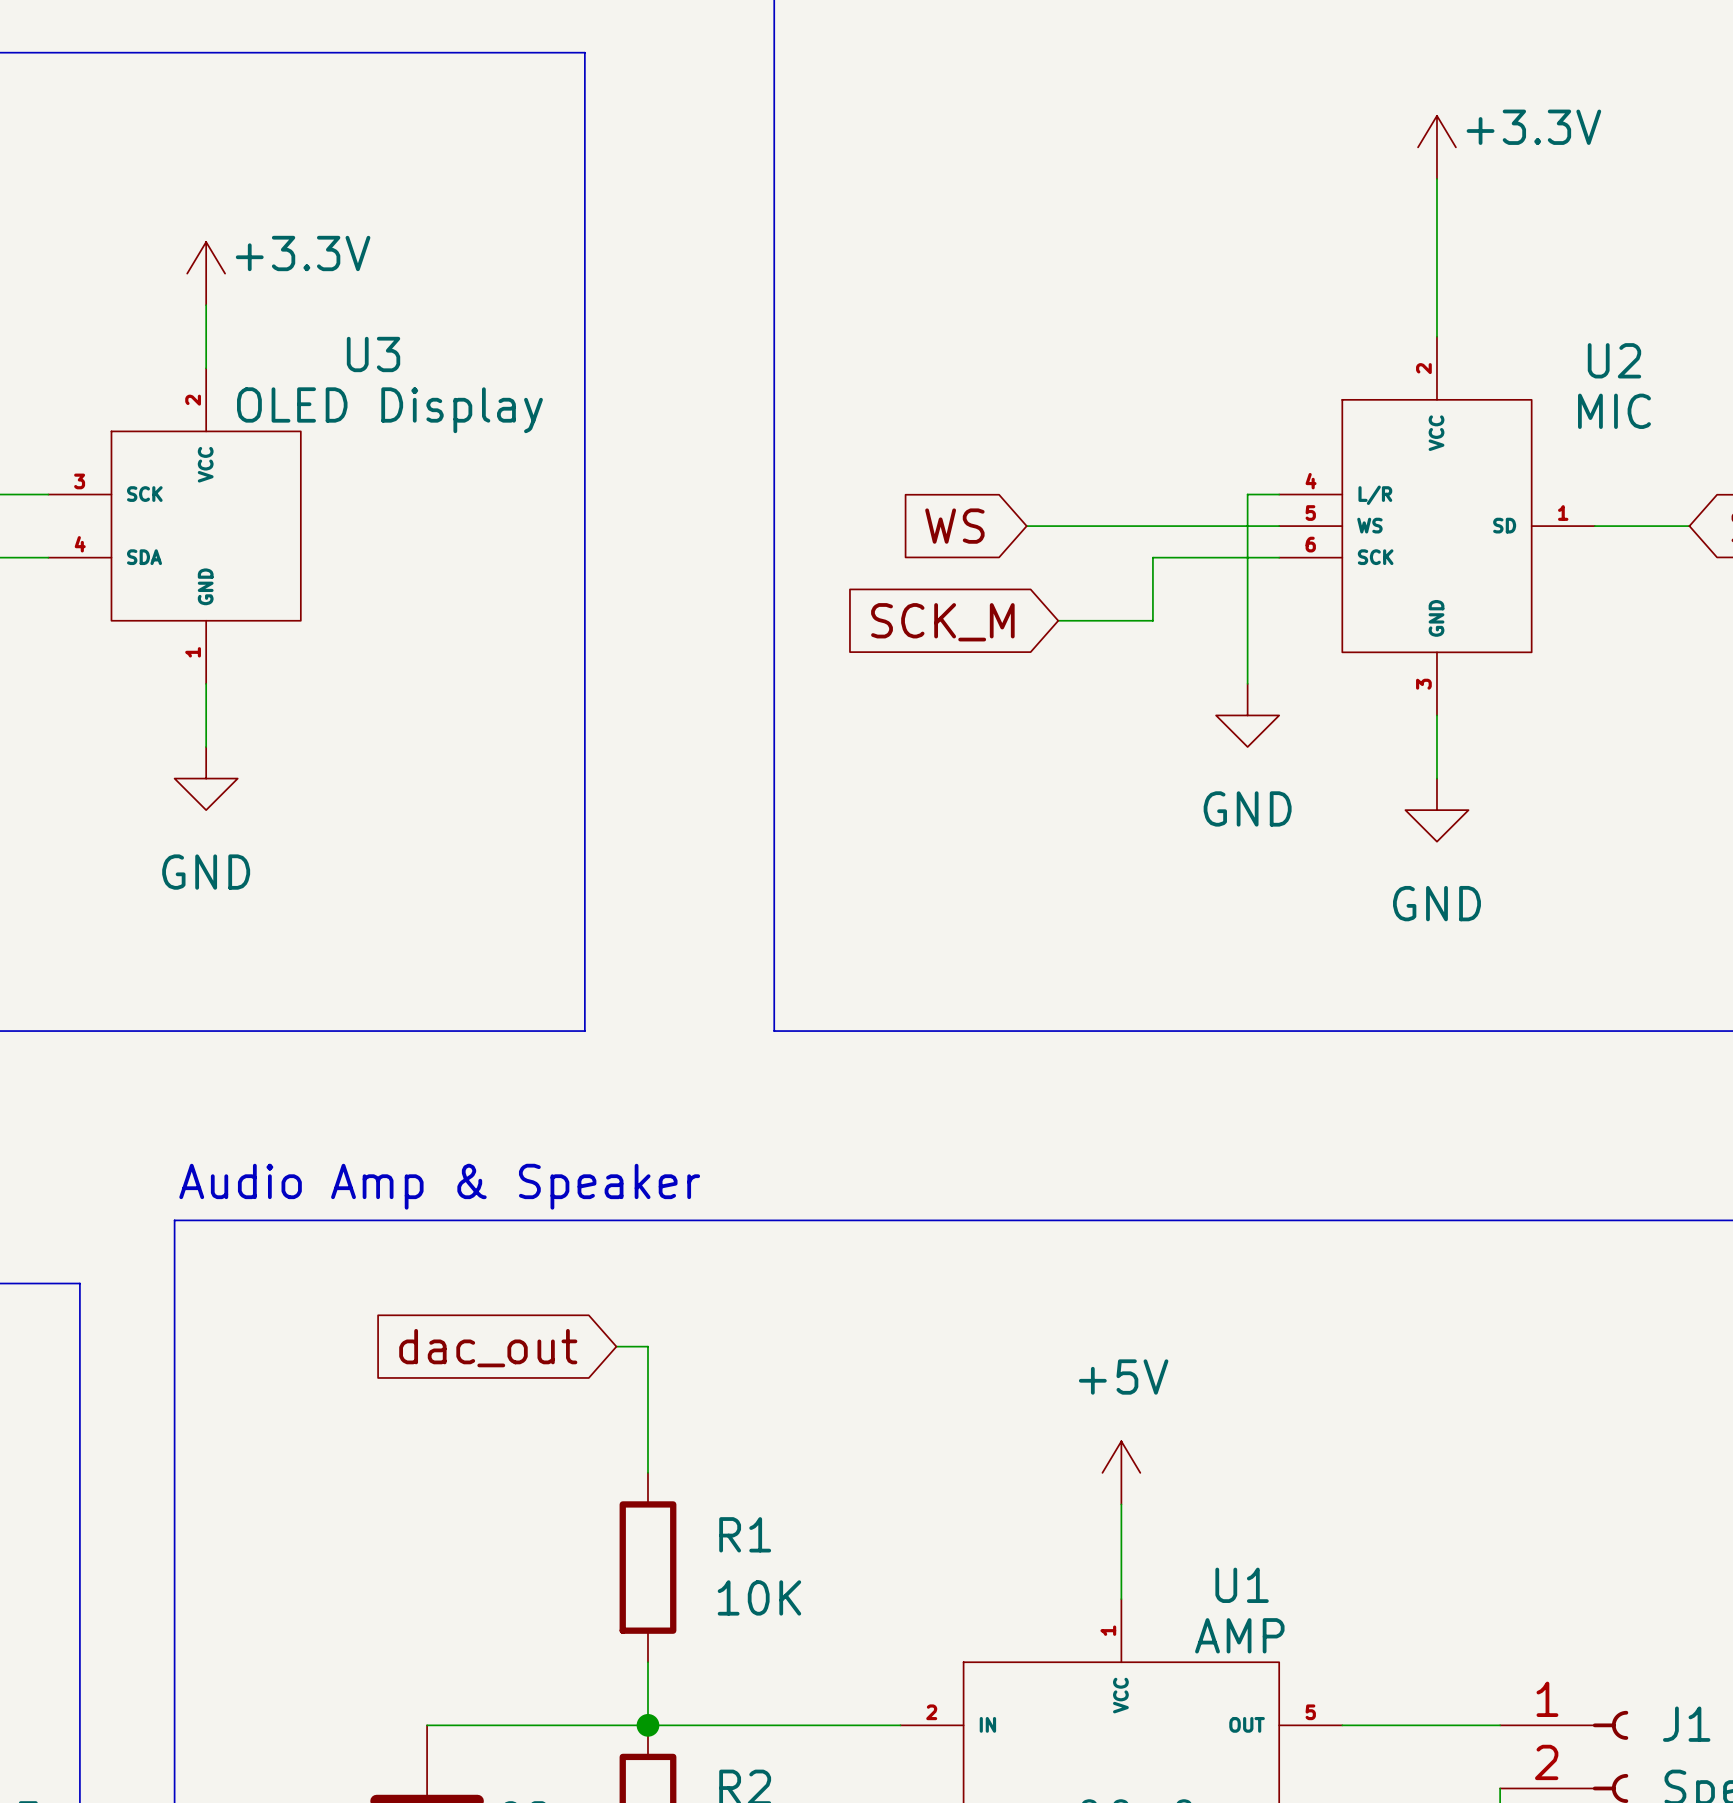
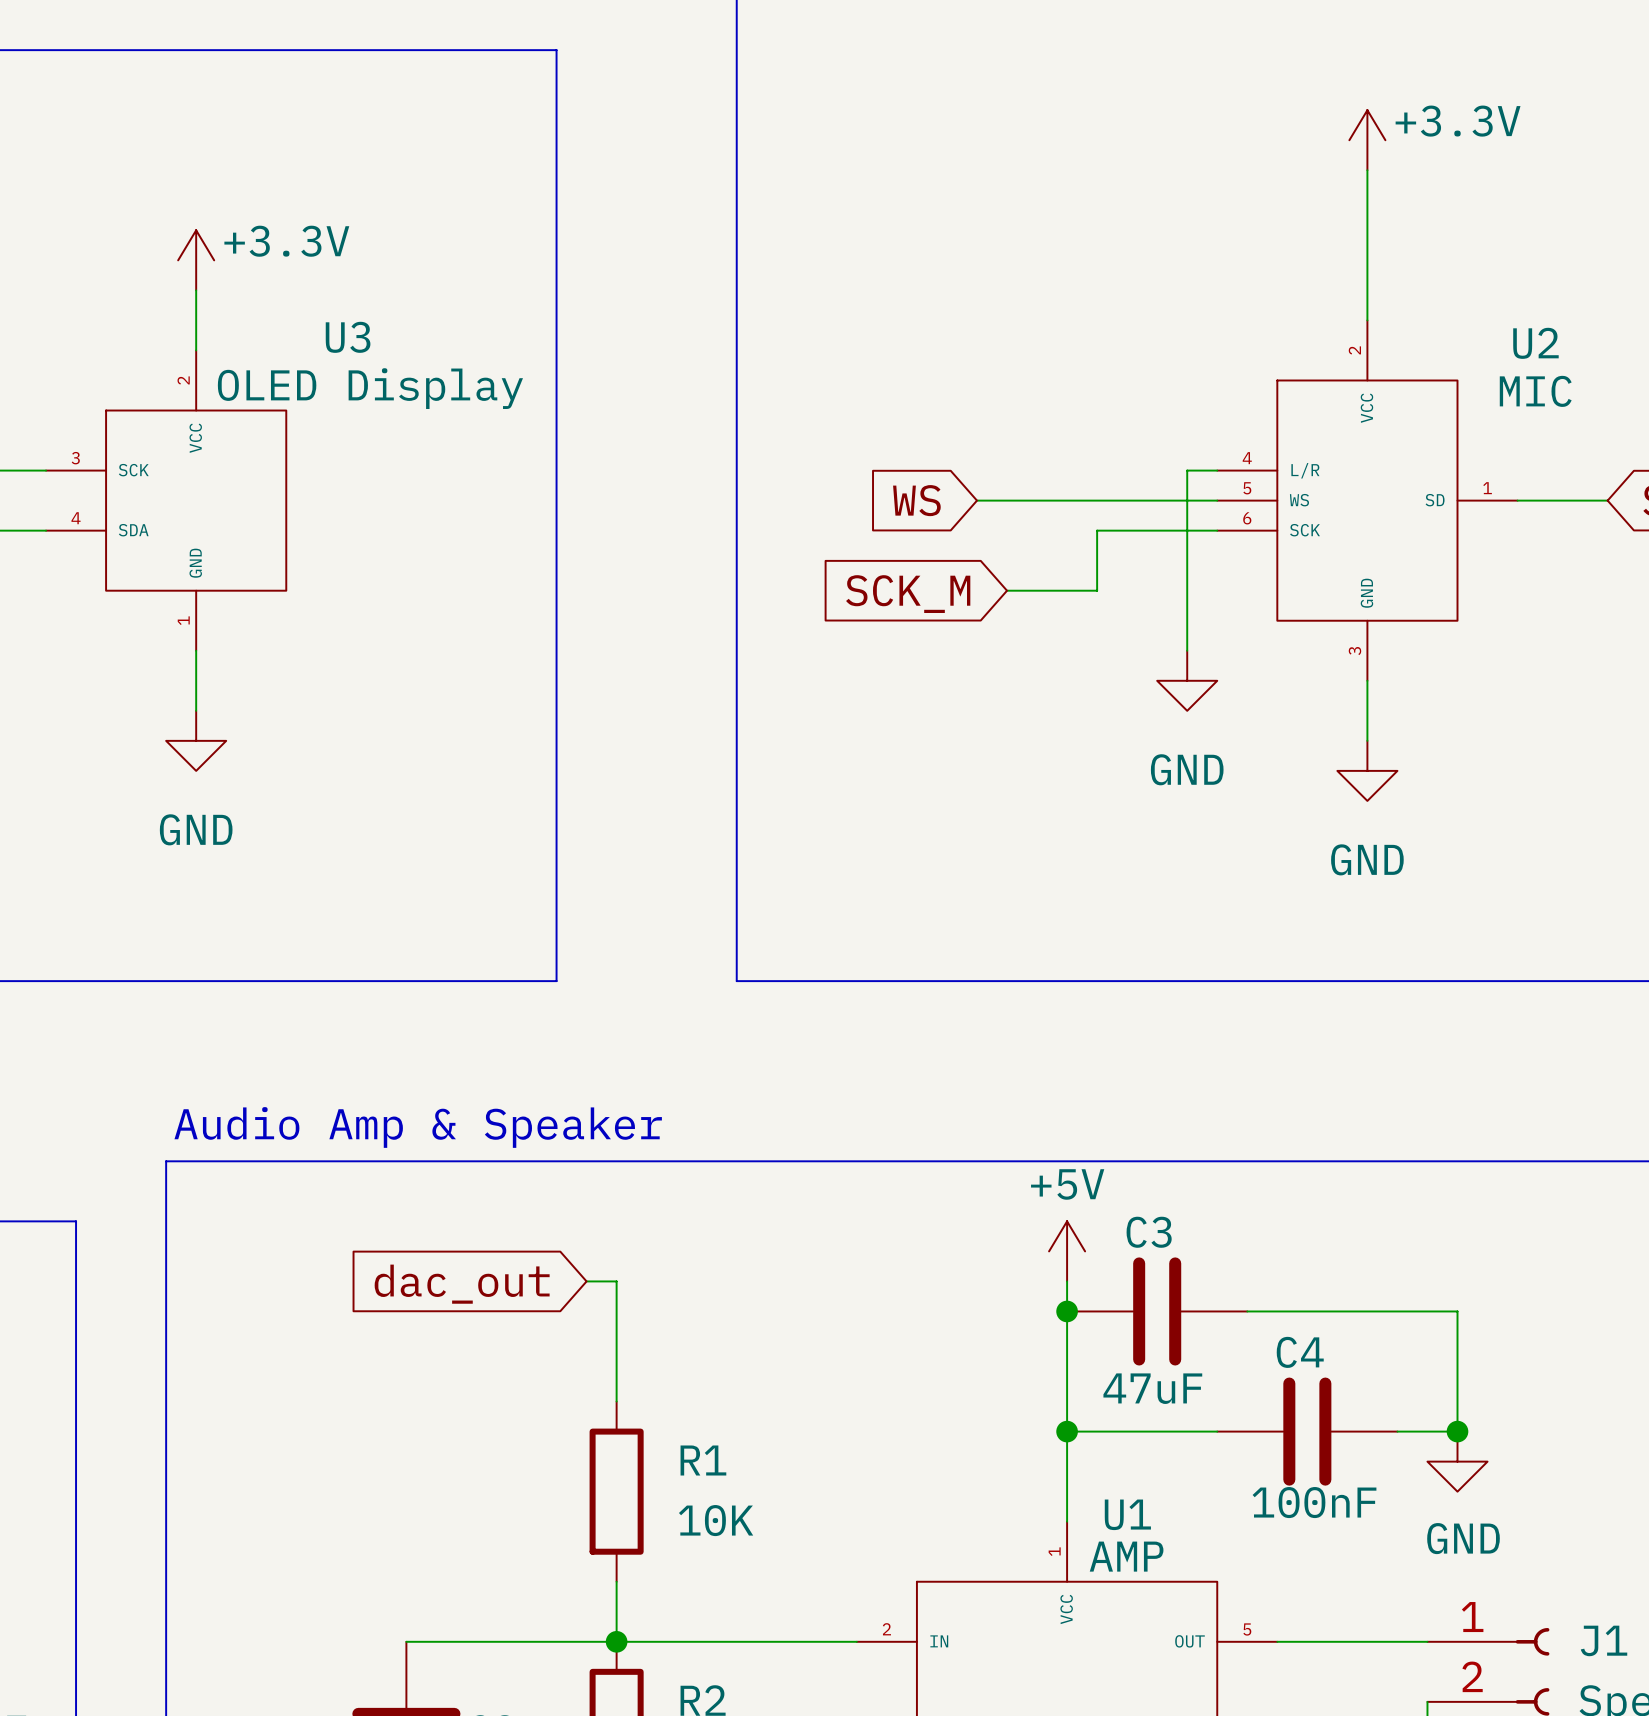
wire: none -> (1067, 1281) (1067, 1431) (1217, 1431)
power symbol text position: +5V (1123, 1377) -> +5V (1067, 1184)
junction: none -> (1067, 1311)
C3: none -> 47uF (1157, 1311)
wire: none -> (1247, 1311) (1457, 1311) (1457, 1431) (1397, 1431)
power symbol position: +5V (1121, 1472) -> +5V (1067, 1251)
junction: none -> (1067, 1431)
C4: none -> 100nF (1307, 1431)
junction: none -> (1457, 1431)
power symbol: none -> GND (1457, 1461)
U1 name position: U1 (1242, 1585) -> U1 (1127, 1514)
U1 value position: AMP (1239, 1635) -> AMP (1126, 1556)

